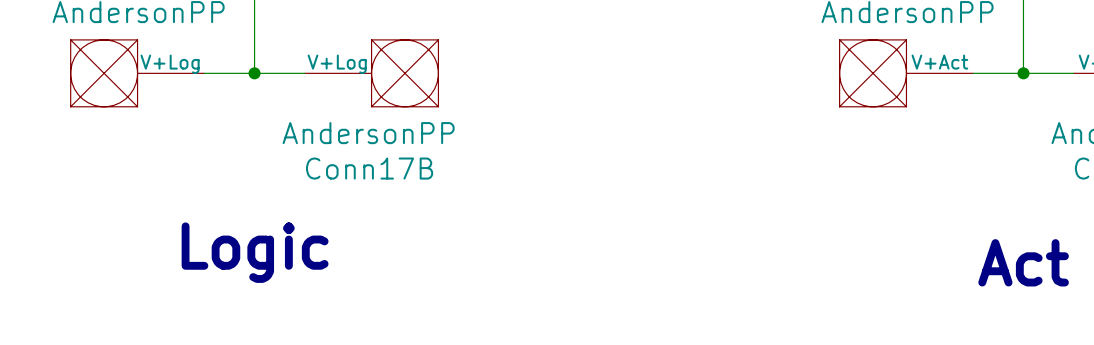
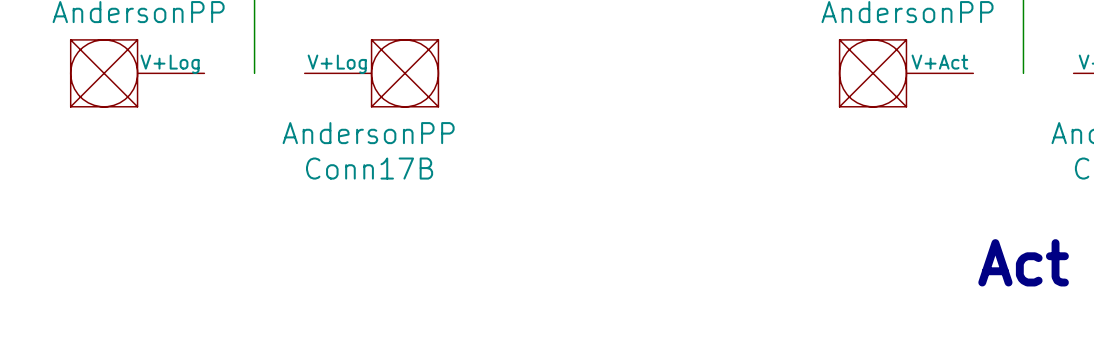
wire: (204, 73) (304, 73) -> none
junction: (254, 73) -> none
wire: (973, 73) (1073, 73) -> none
junction: (1023, 73) -> none
text: Logic (255, 252) -> none

